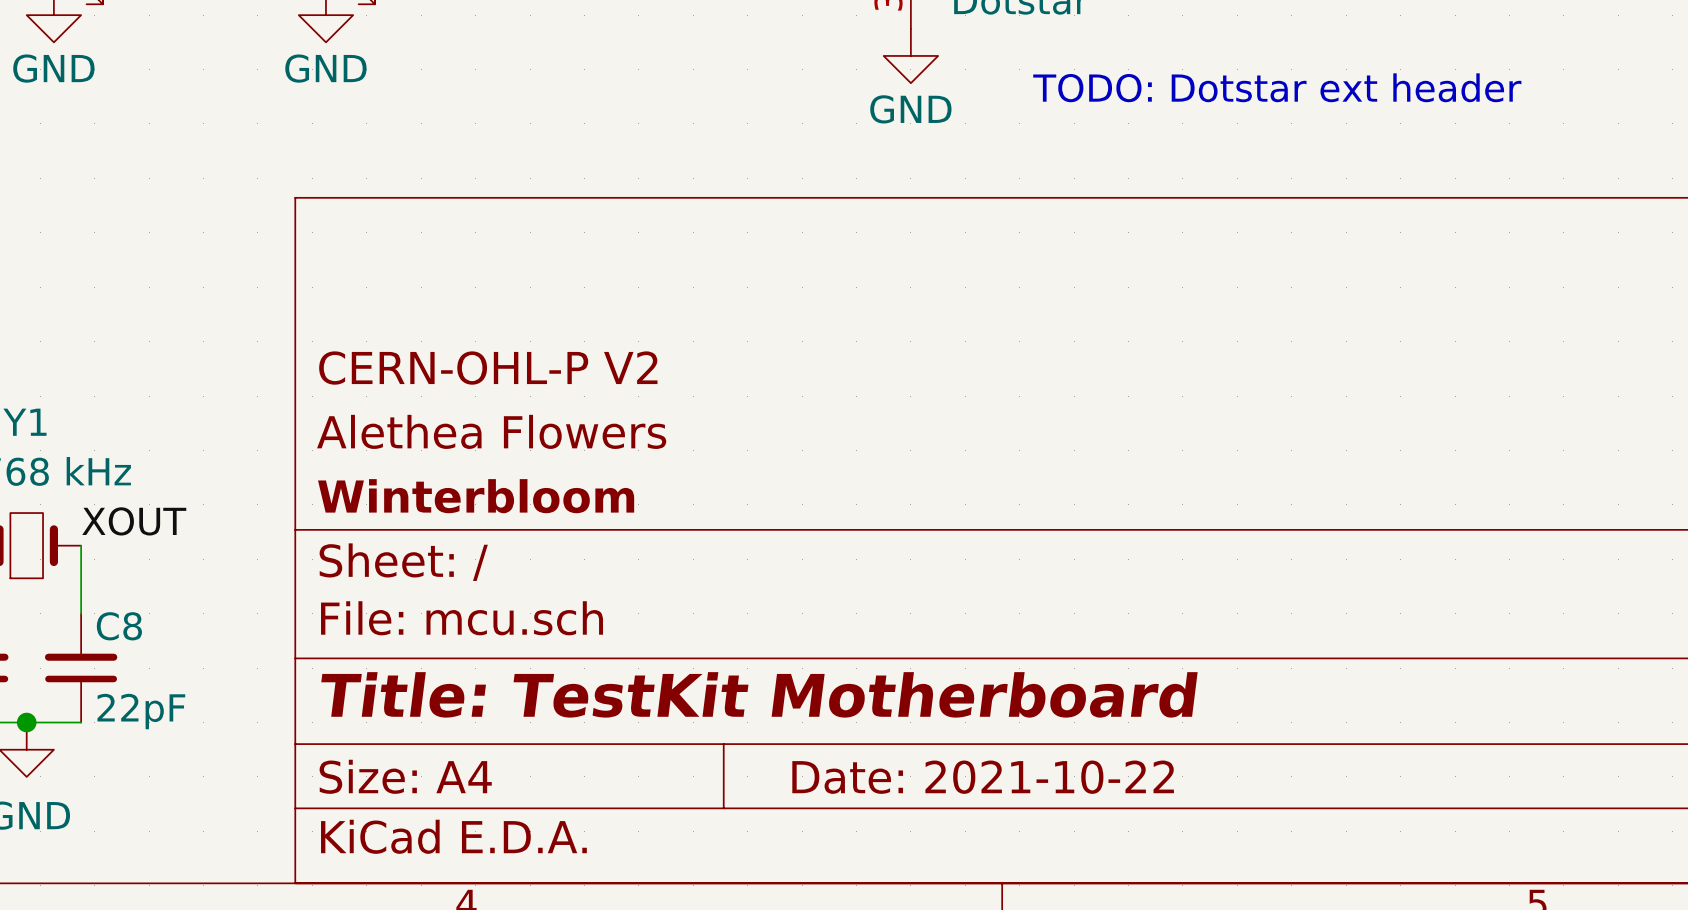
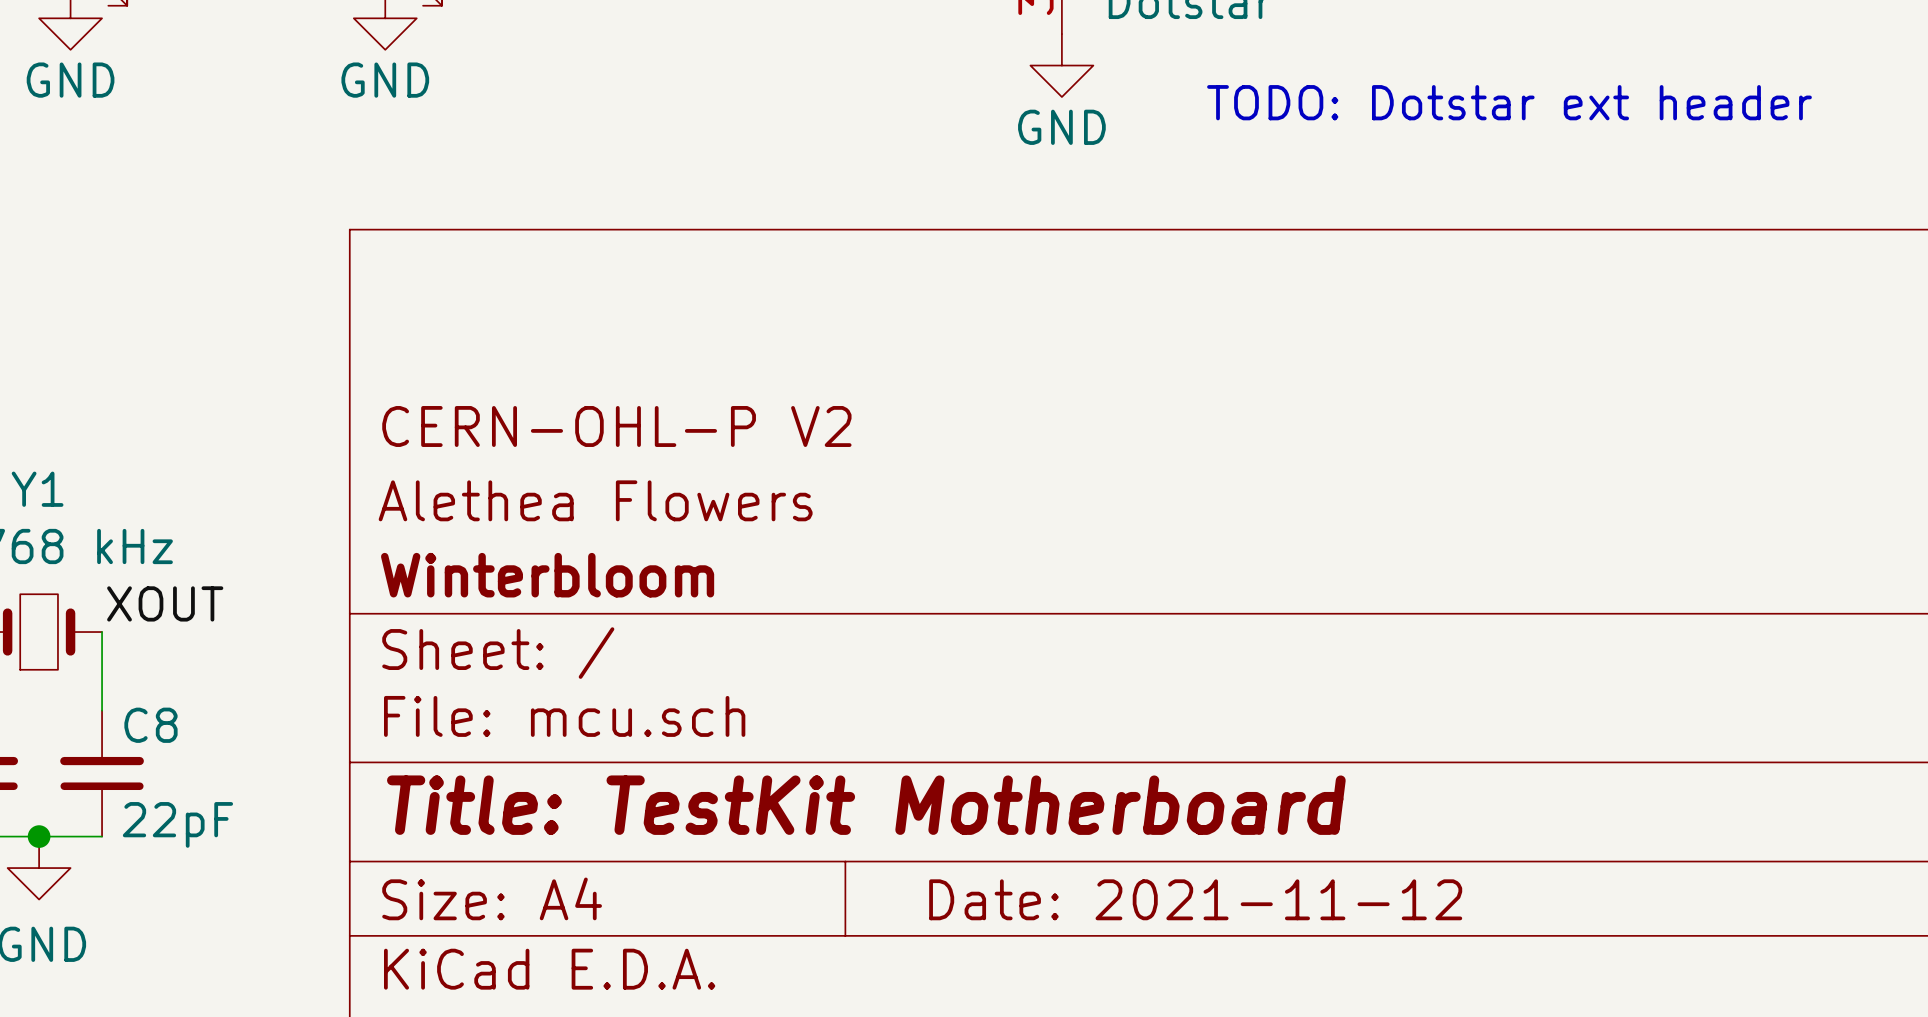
title block: Date: 2021-10-22 (983, 777) -> Date: 2021-11-12 (1195, 899)

